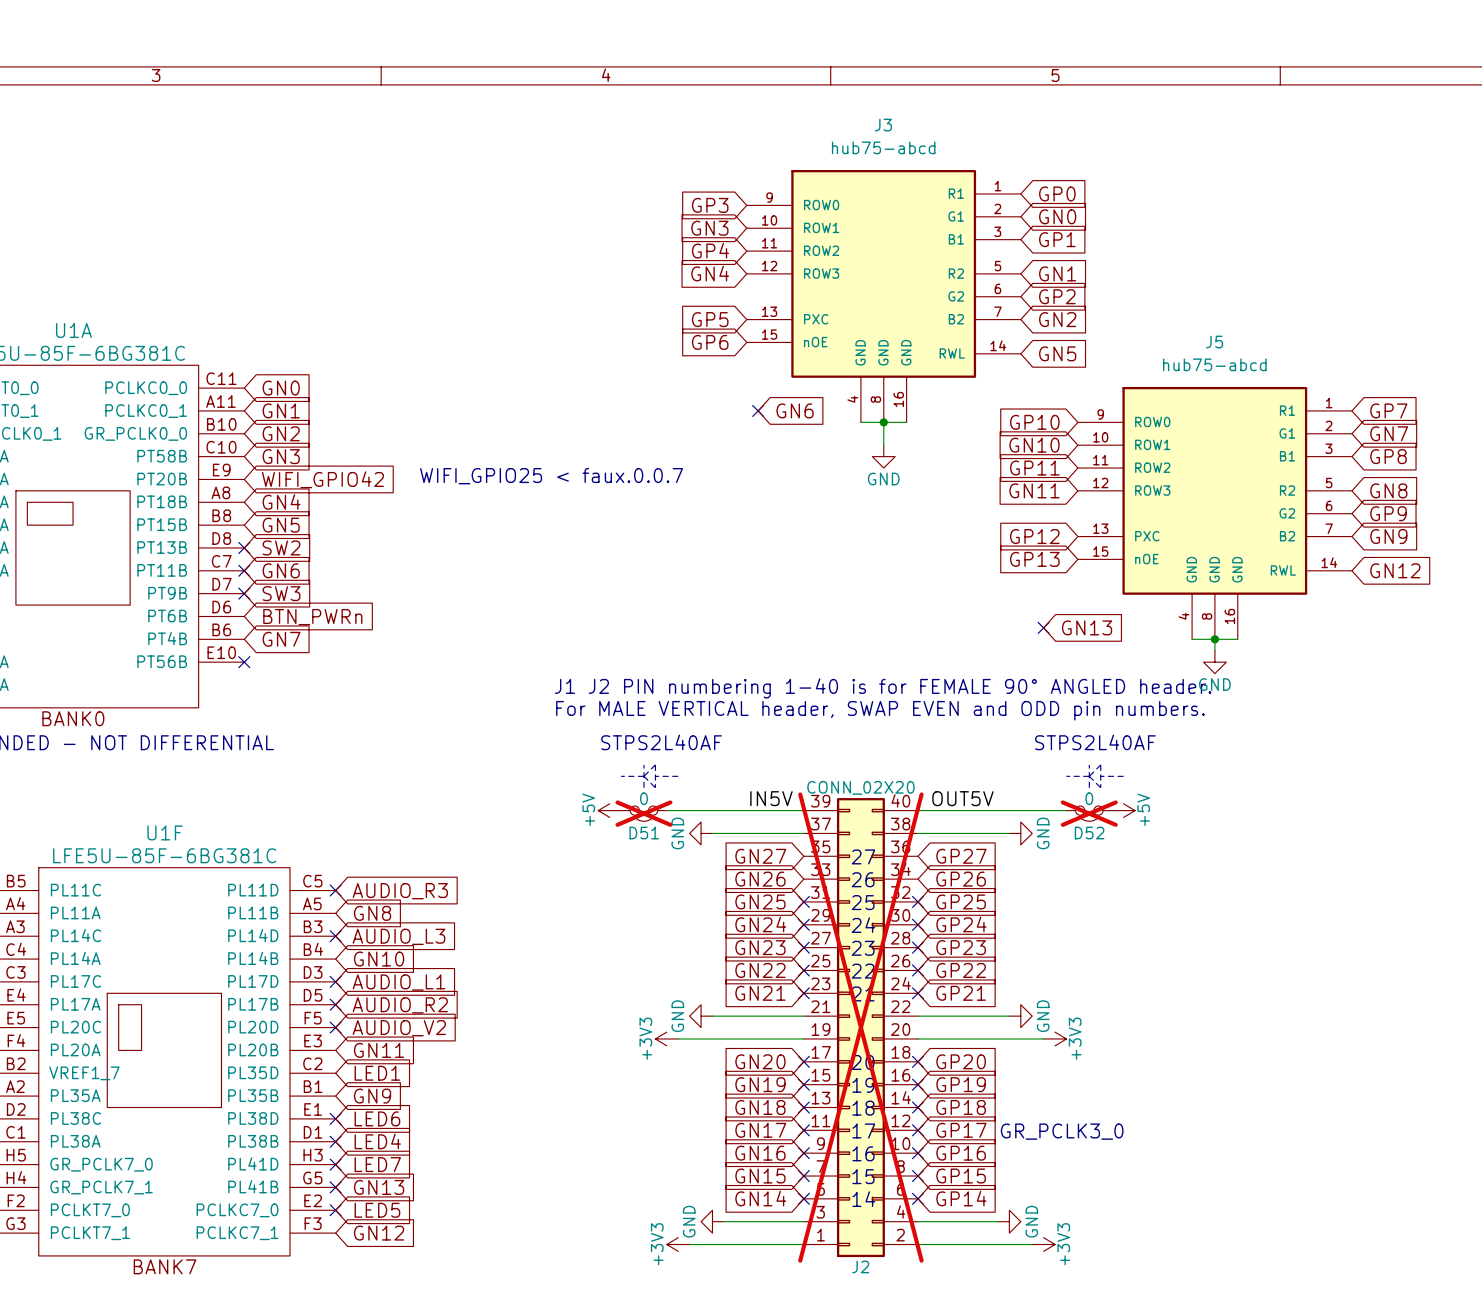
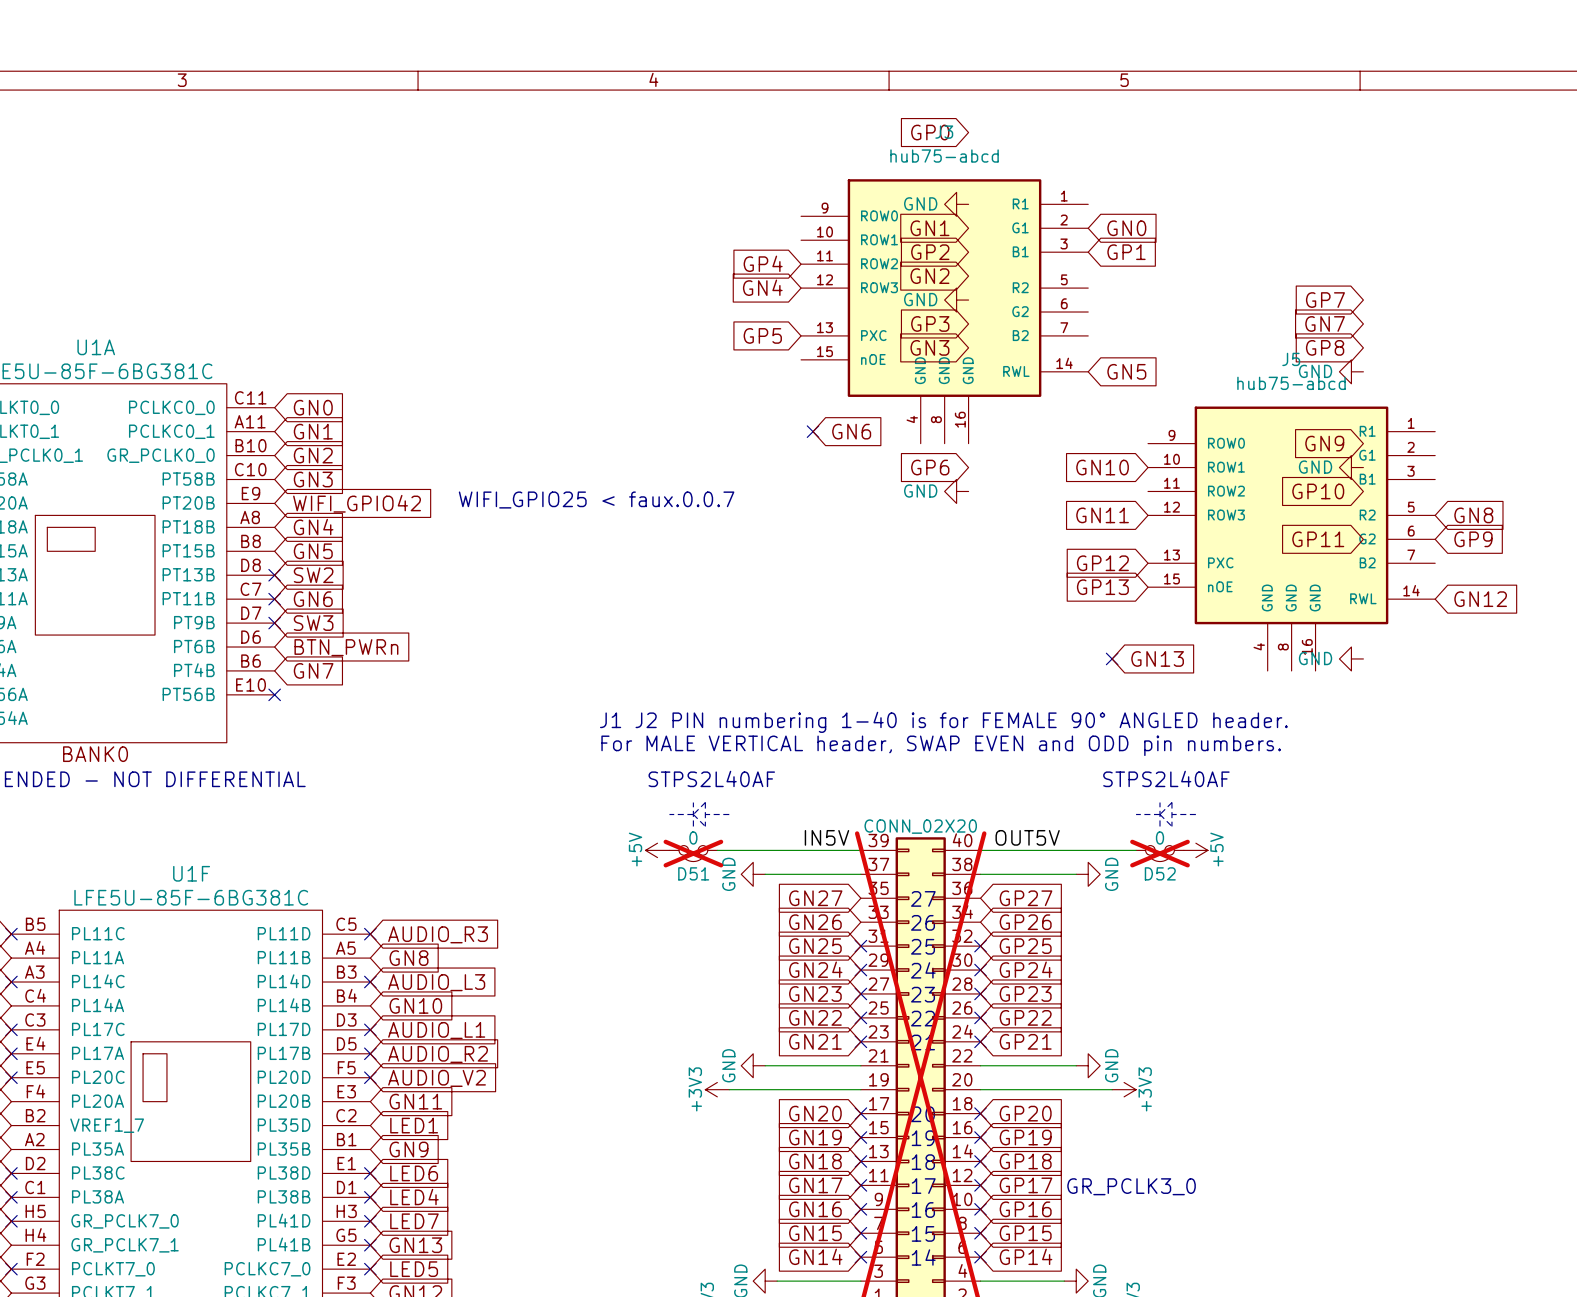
power symbol: none -> GND (956, 204)
global label rotation: 0° (1057, 193) -> 180° (930, 132)
global label position: GP0 (1057, 193) -> GP0 (930, 132)
global label position: GP3 (710, 205) -> GP3 (930, 323)
global label position: GN3 (709, 228) -> GN3 (929, 347)
global label rotation: 0° (1057, 273) -> 180° (929, 228)
global label position: GN1 (1057, 273) -> GN1 (929, 228)
power symbol: none -> GND (956, 300)
global label rotation: 0° (1057, 296) -> 180° (930, 252)
global label position: GP2 (1057, 296) -> GP2 (930, 252)
global label rotation: 0° (1057, 319) -> 180° (929, 276)
global label position: GN2 (1057, 319) -> GN2 (929, 276)
global label position: GP6 (710, 342) -> GP6 (930, 467)
power symbol: none -> GND (1351, 371)
global label rotation: 0° (1388, 410) -> 180° (1325, 300)
global label position: GP7 (1388, 410) -> GP7 (1325, 300)
wire: (860, 422) (906, 422) -> none
wire: (883, 422) (883, 445) -> none
junction: (883, 422) -> none
global label position: GP10 (1034, 422) -> GP10 (1318, 491)
global label rotation: 0° (1389, 433) -> 180° (1325, 323)
global label position: GN7 (1389, 433) -> GN7 (1325, 323)
power symbol: none -> GND (1351, 467)
power symbol rotation: 0° (883, 456) -> 90° clockwise (956, 491)
power symbol position: GND (883, 456) -> GND (956, 491)
global label rotation: 0° (1388, 456) -> 180° (1325, 347)
global label position: GP8 (1388, 456) -> GP8 (1325, 347)
global label position: GP11 (1034, 468) -> GP11 (1318, 539)
global label rotation: 0° (1388, 536) -> 180° (1324, 443)
global label position: GN9 (1388, 536) -> GN9 (1324, 443)
wire: (1192, 639) (1237, 639) -> none
wire: (1214, 639) (1214, 650) -> none
junction: (1214, 639) -> none
power symbol rotation: 0° (1214, 662) -> 90° clockwise (1351, 658)
power symbol position: GND (1214, 662) -> GND (1351, 658)

